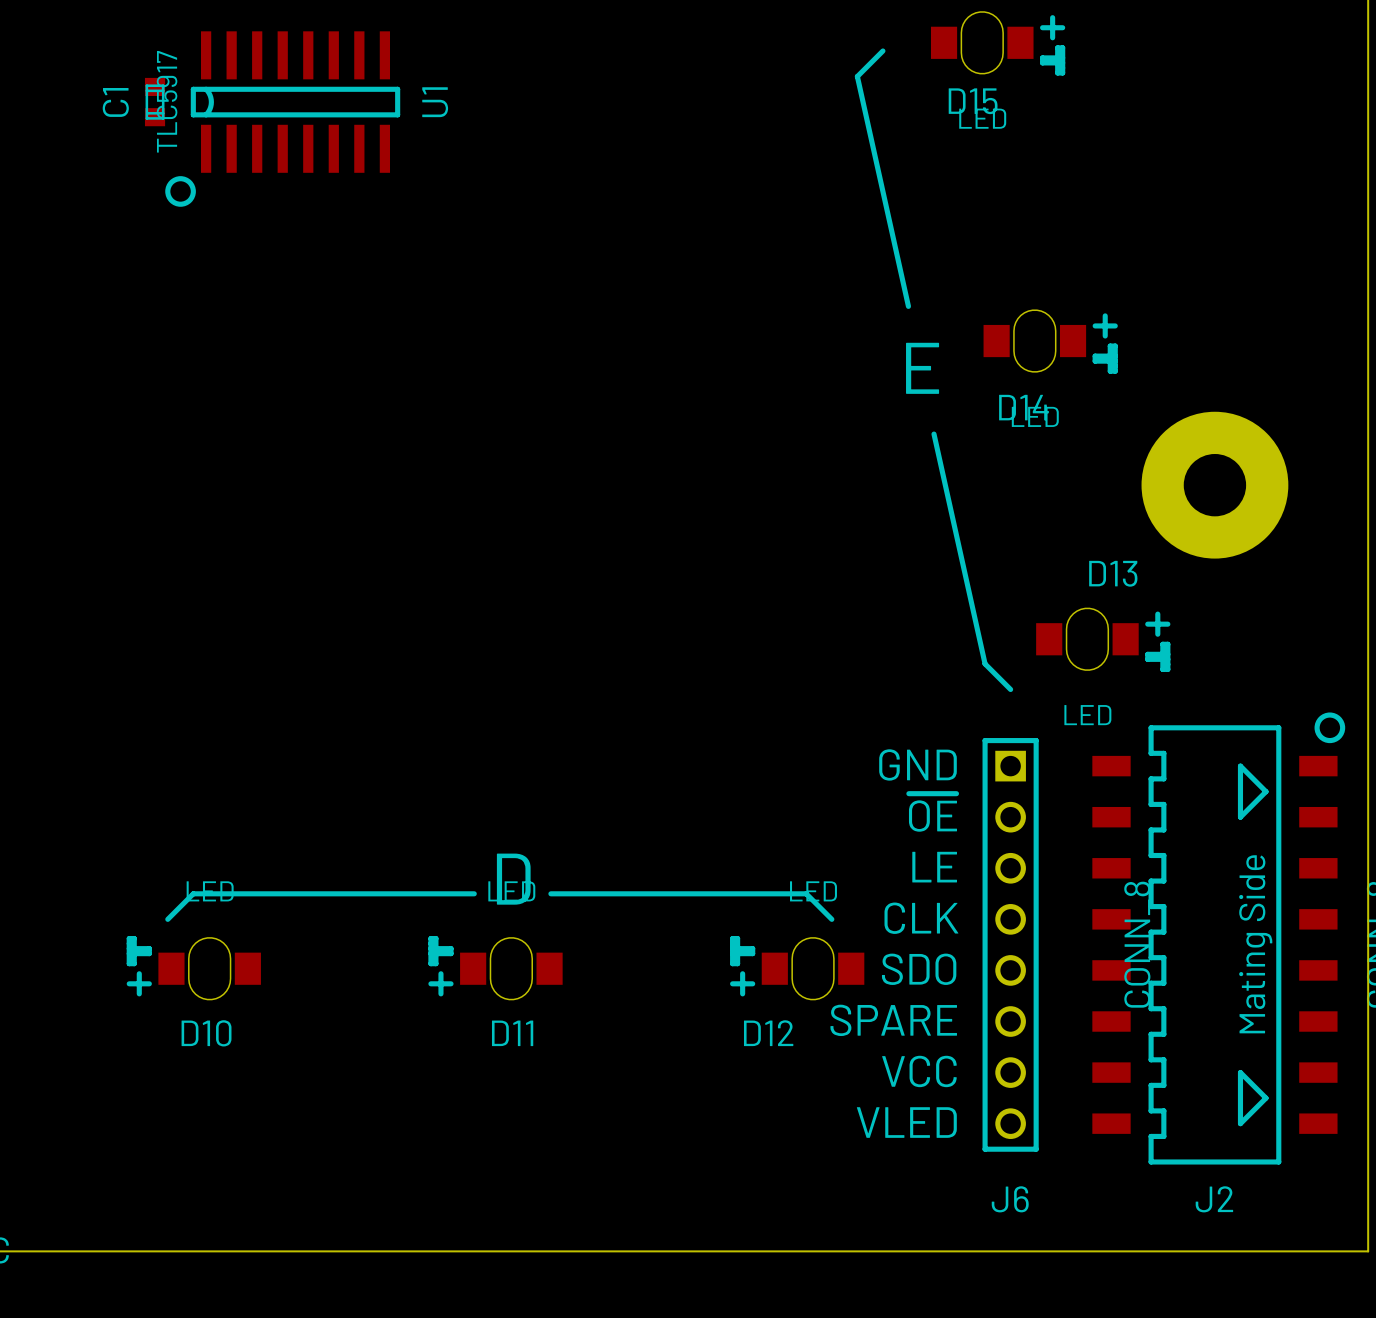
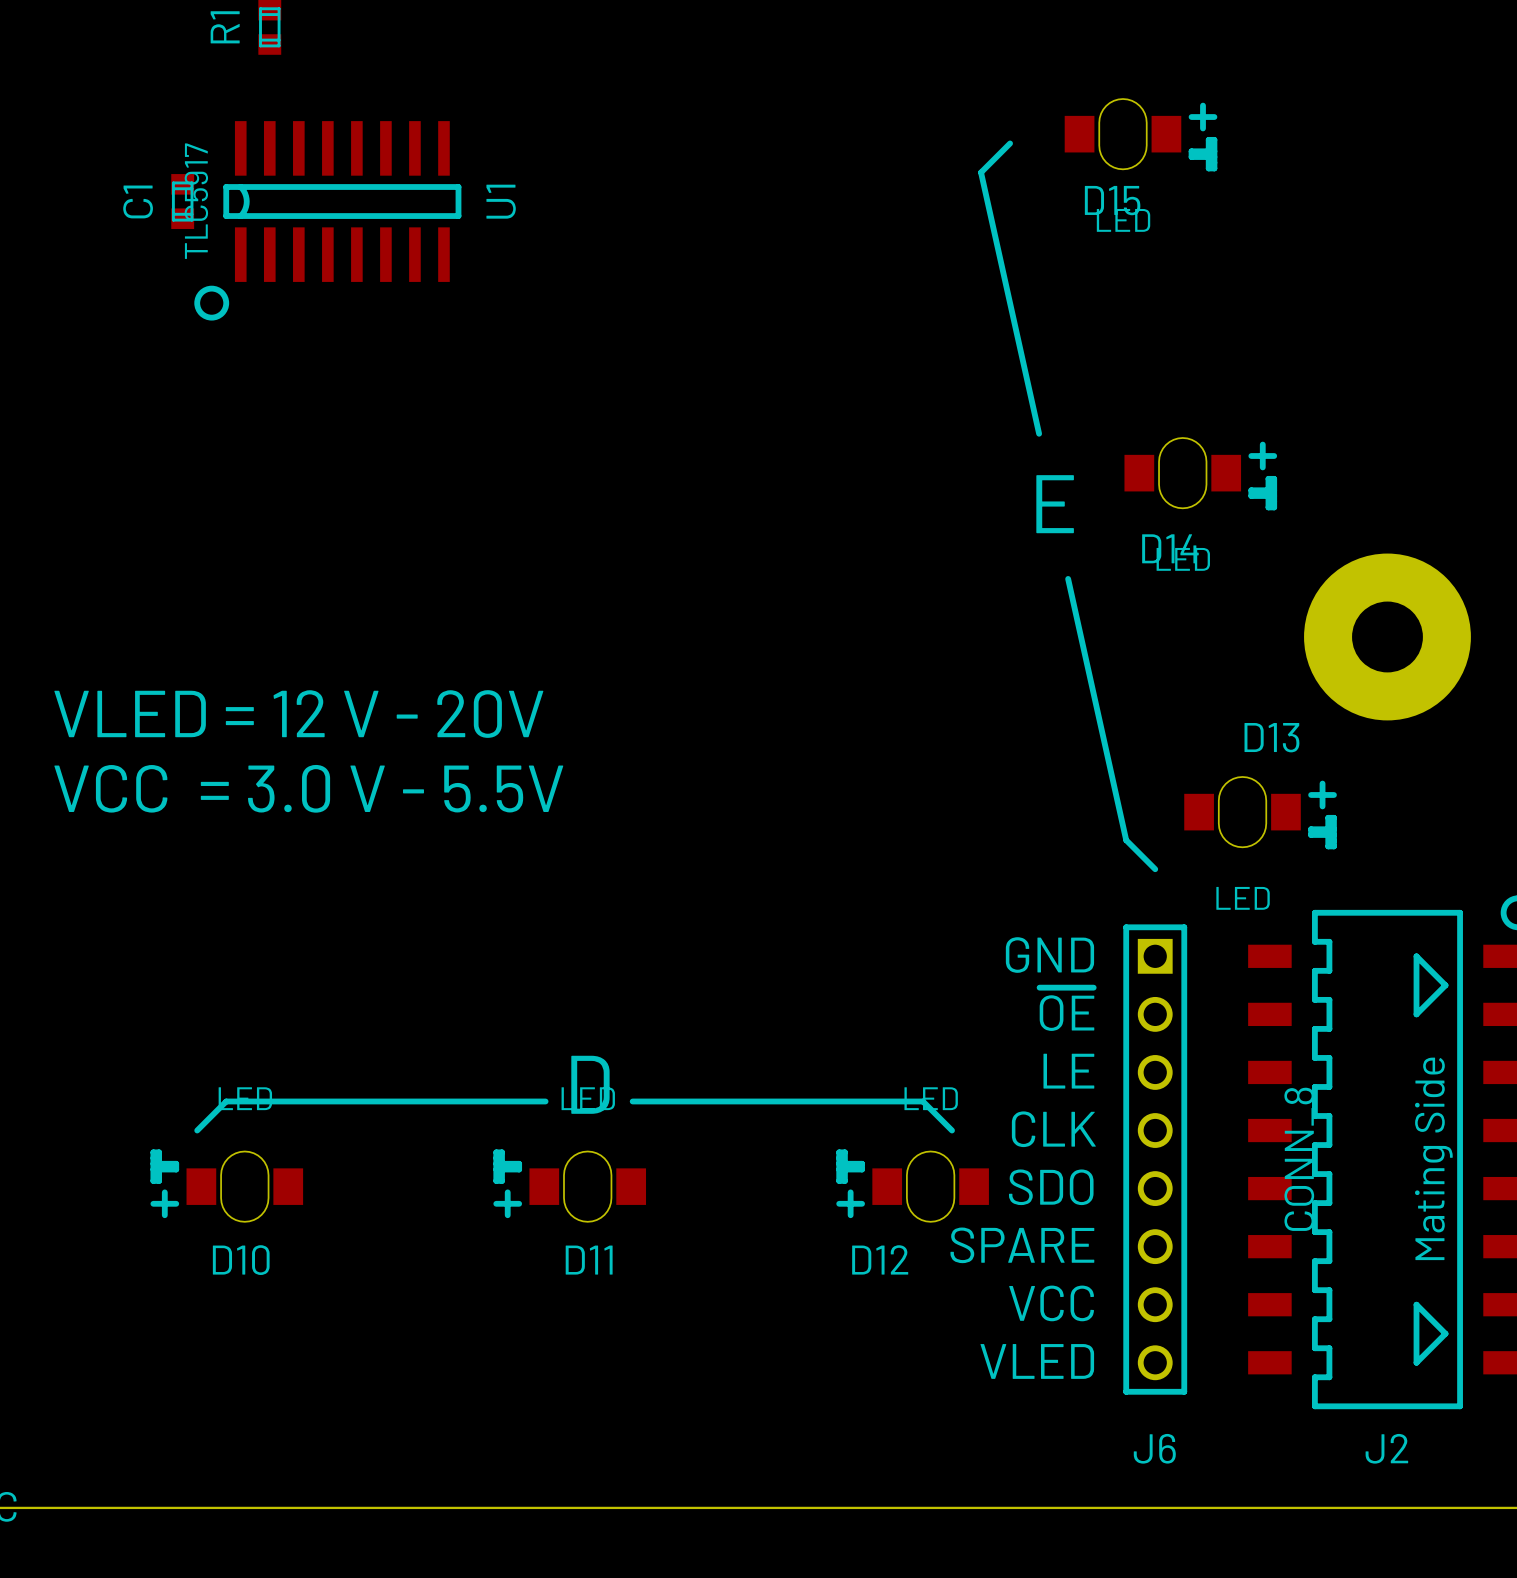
text: none -> VLED = 12 V - 20V (298, 714)
text: none -> VCC = 3.0 V - 5.5V (308, 788)

